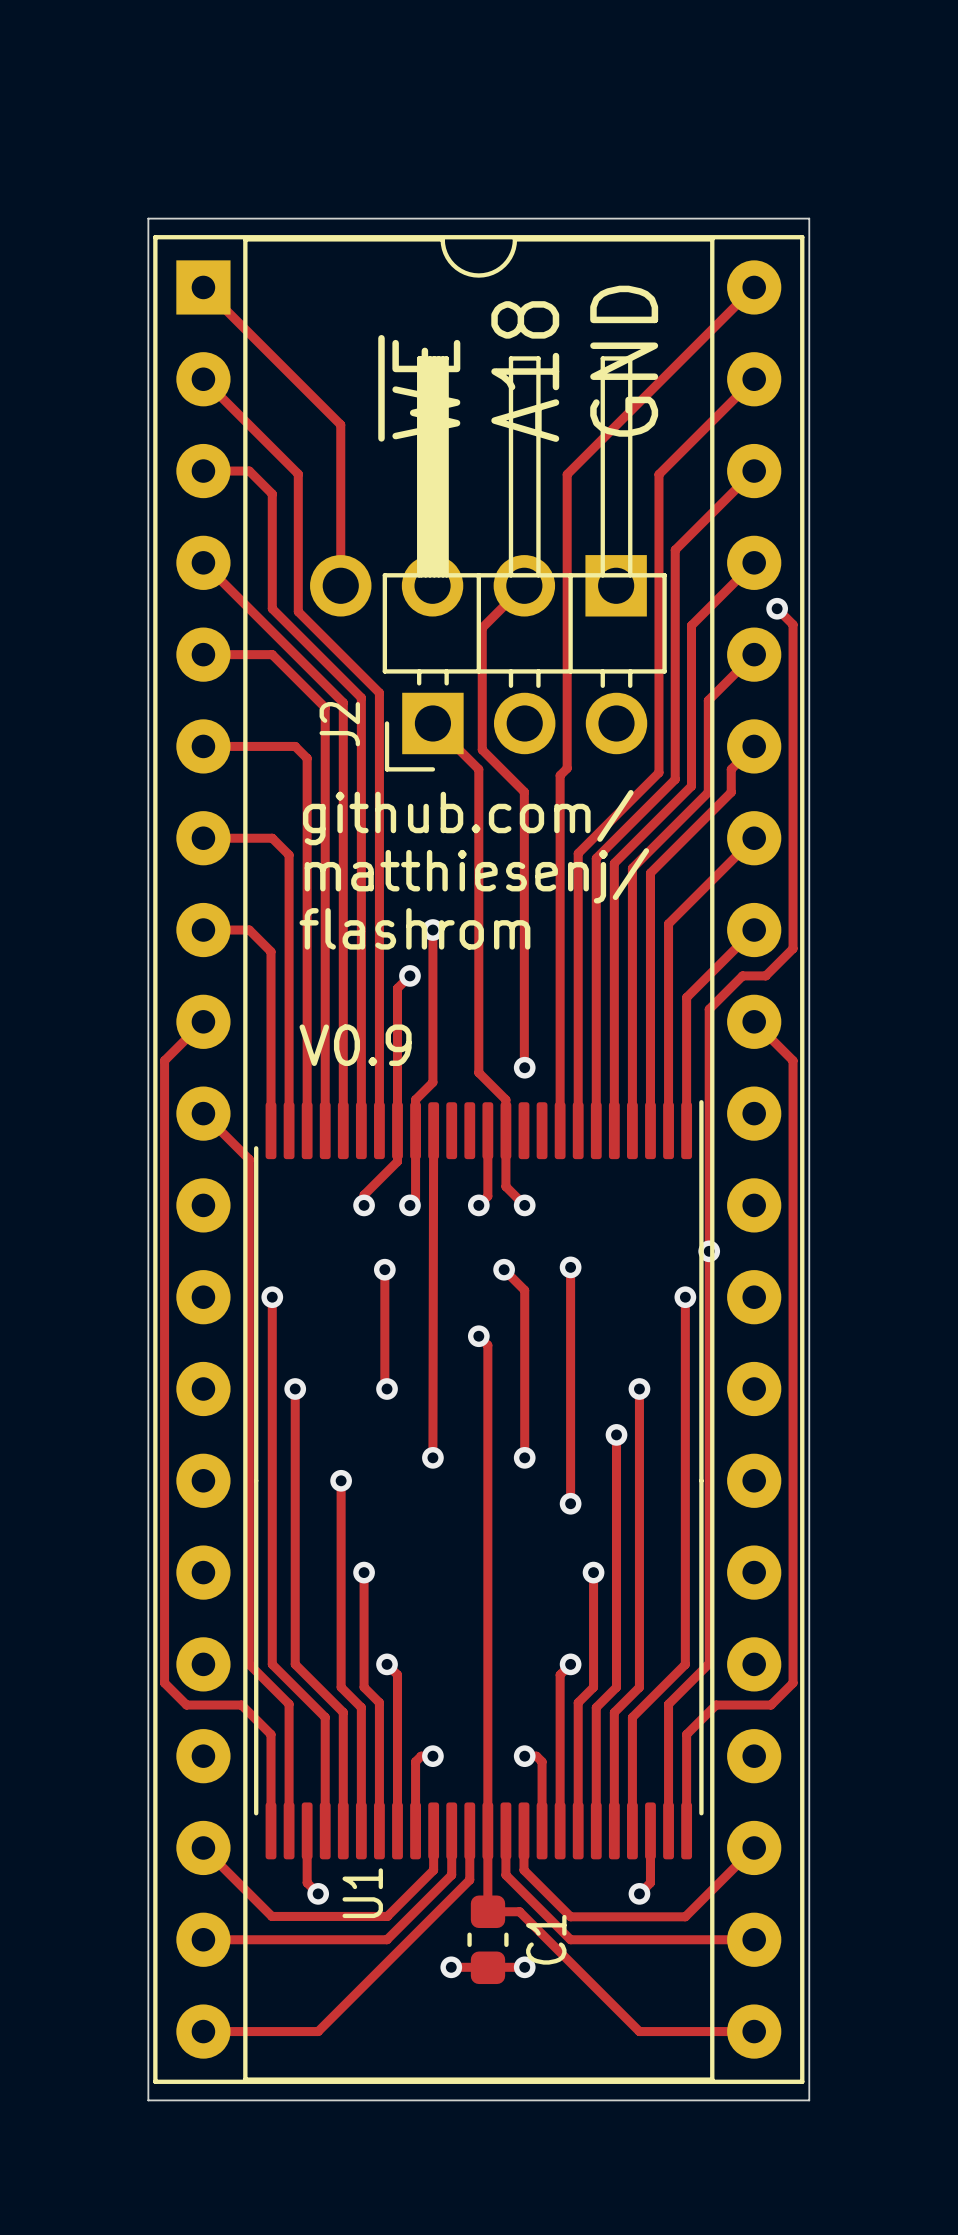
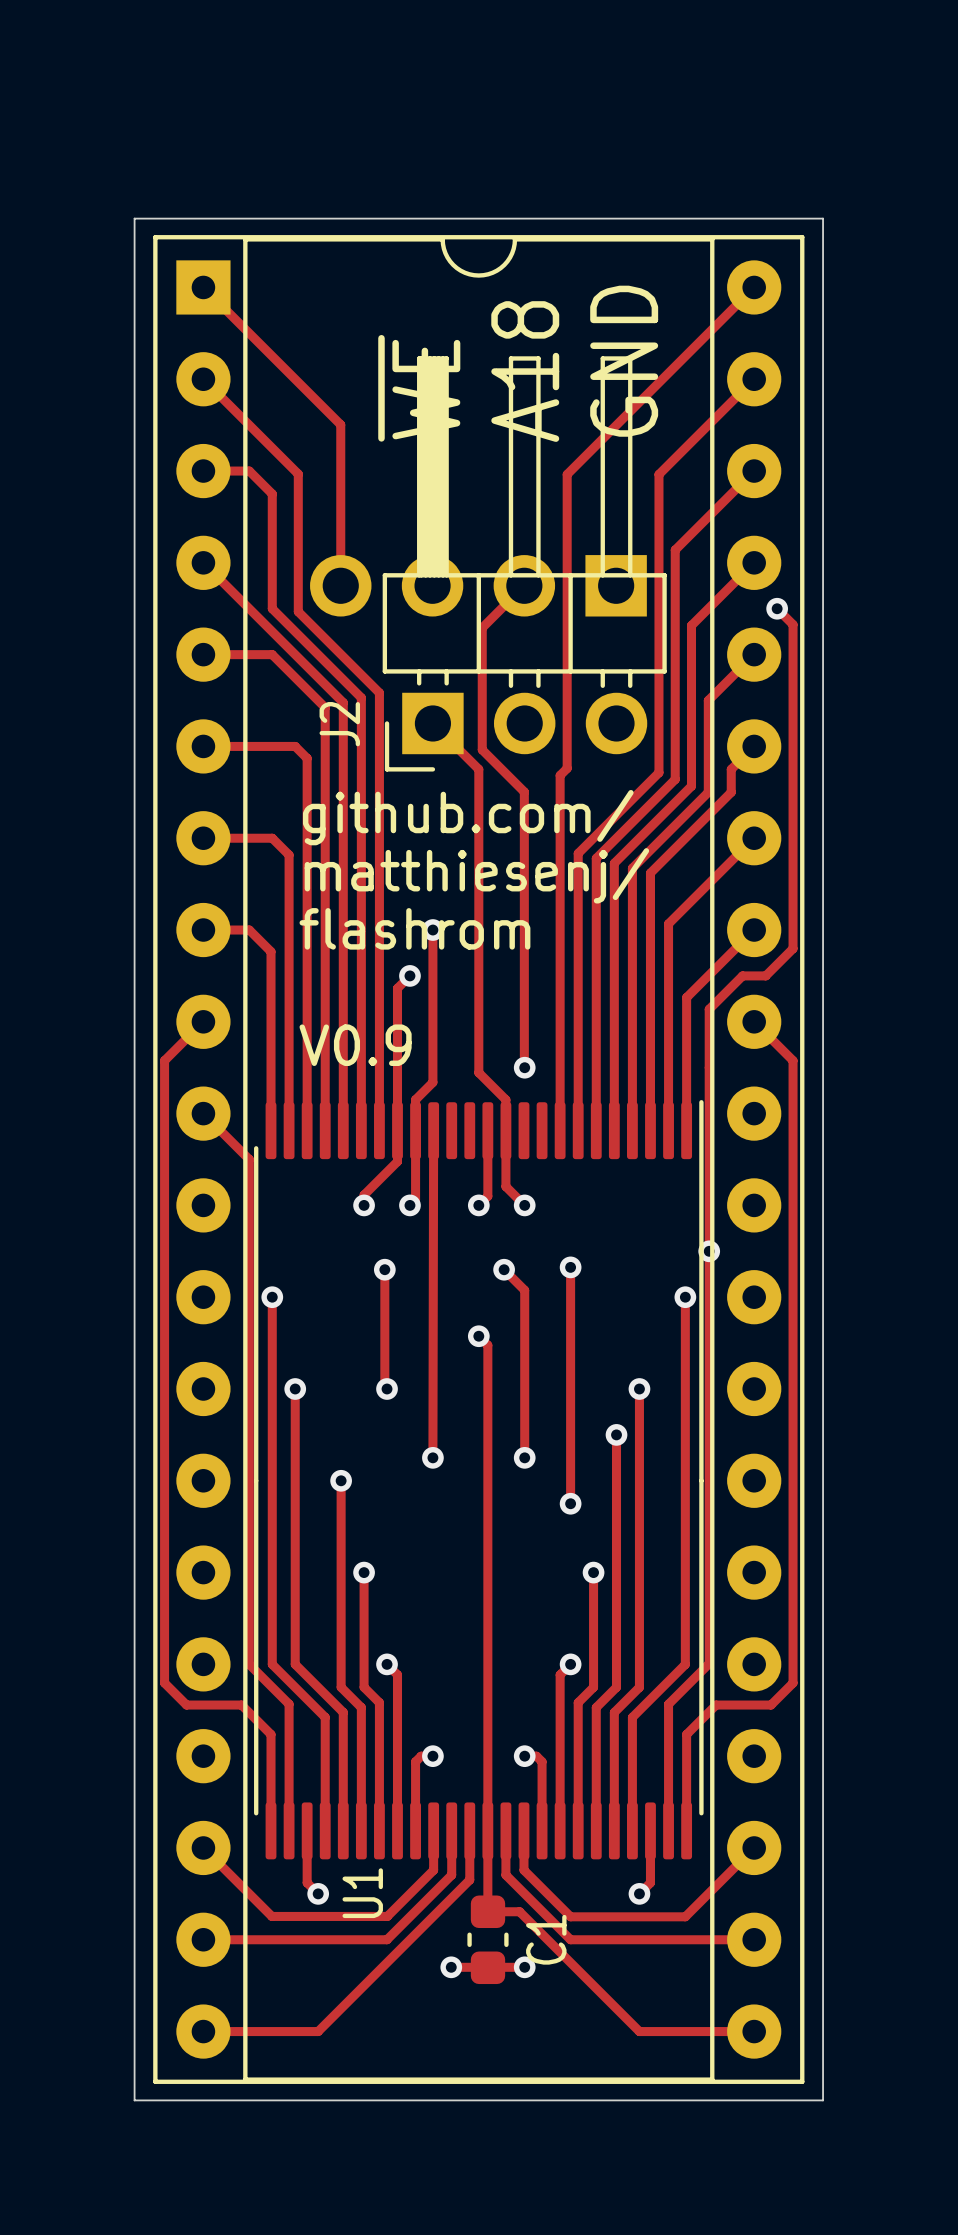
board edge: (148, 218) (148, 2100) -> (148, 218) (134, 218) (134, 2100) (148, 2100)
board edge: (809, 218) (809, 2100) -> (809, 218) (823, 218) (823, 2100) (809, 2100)

